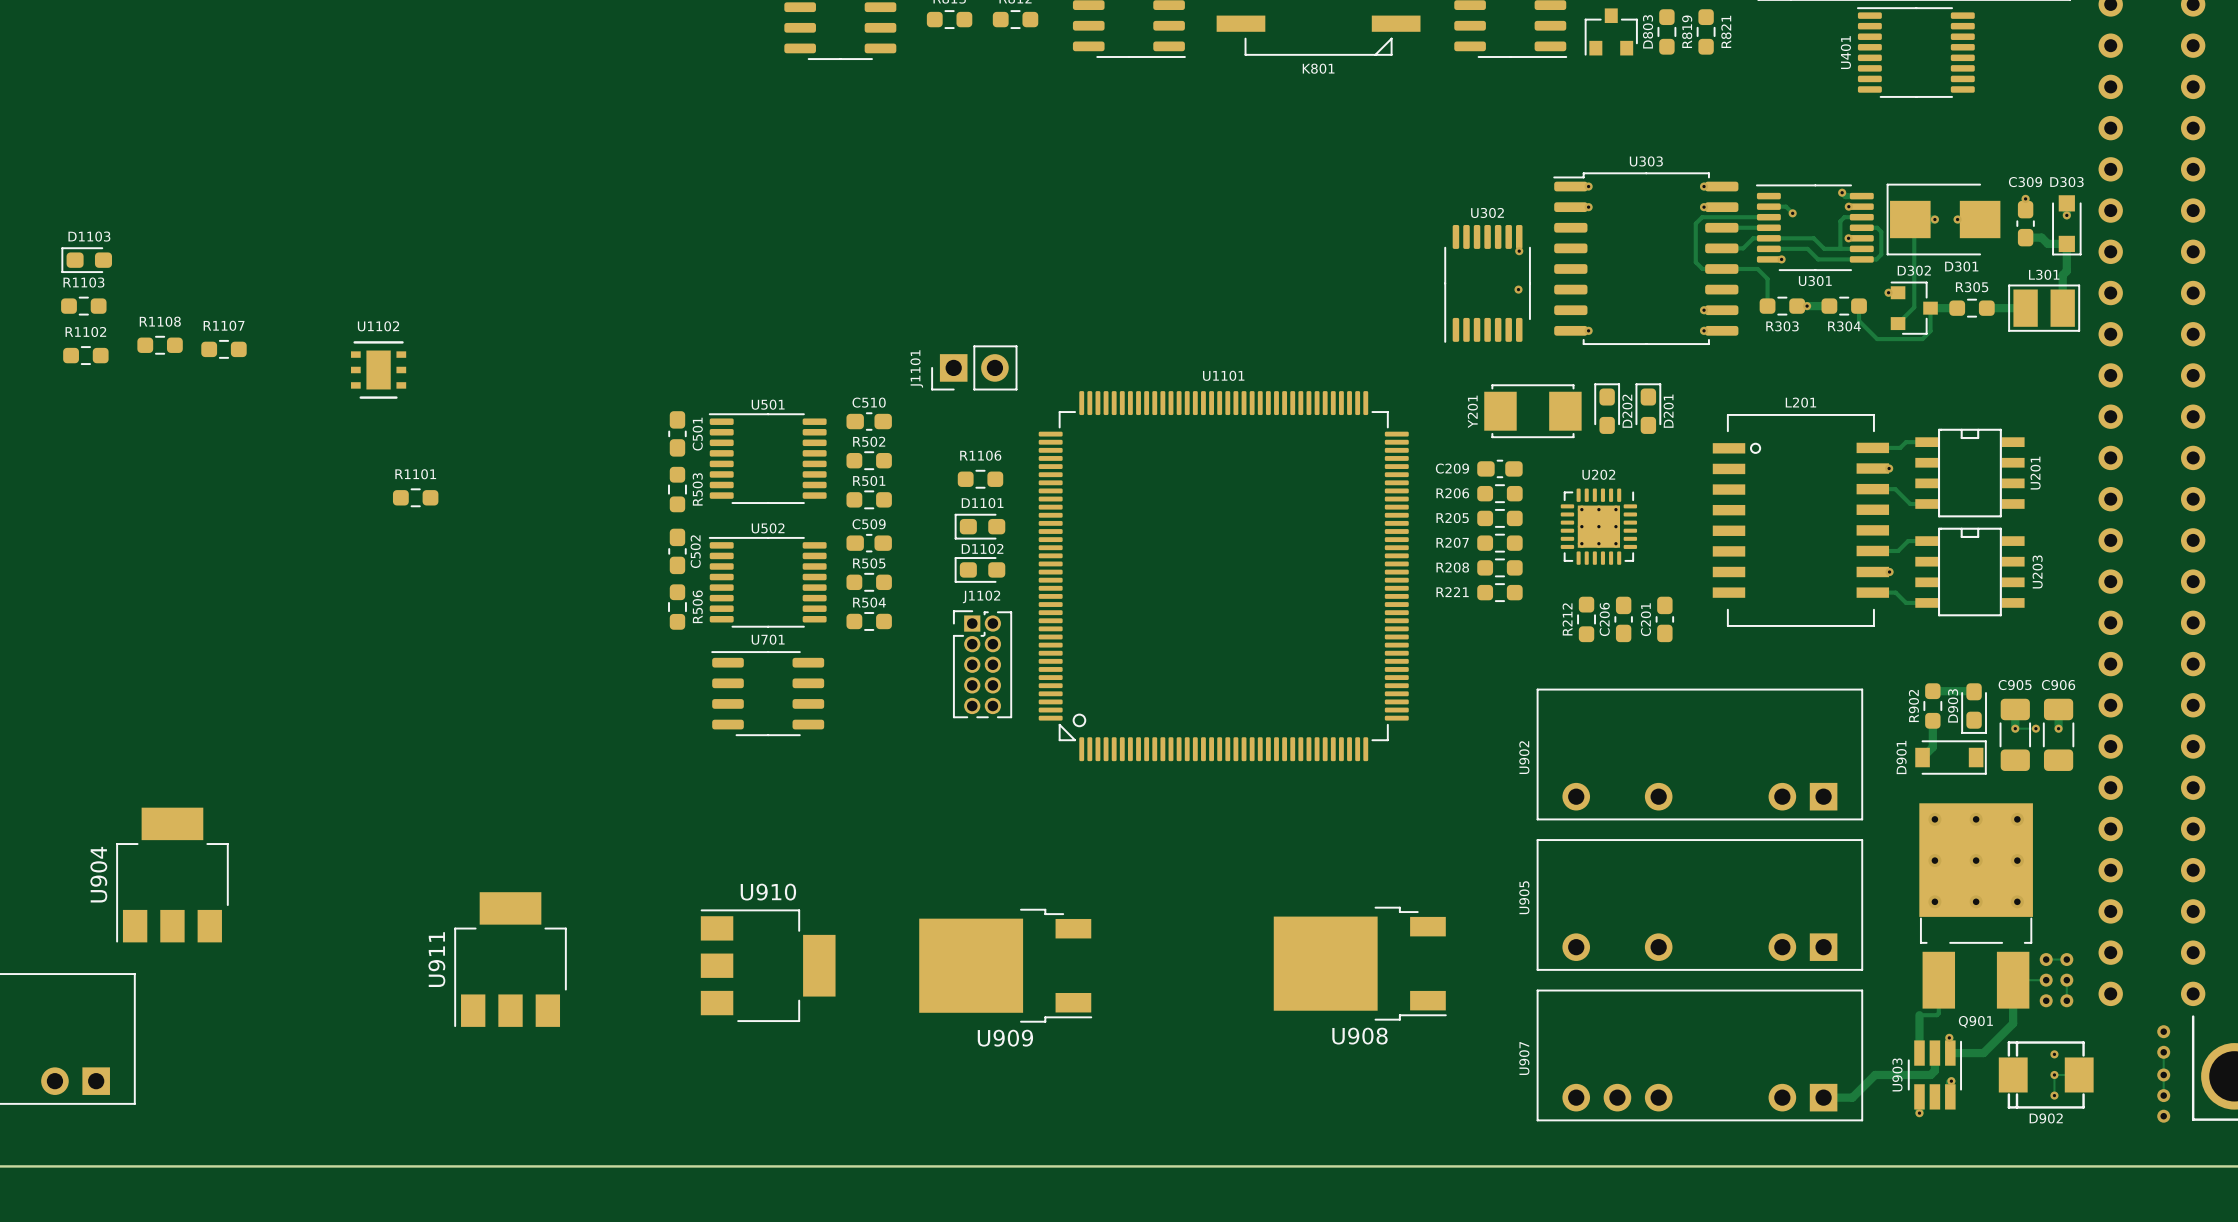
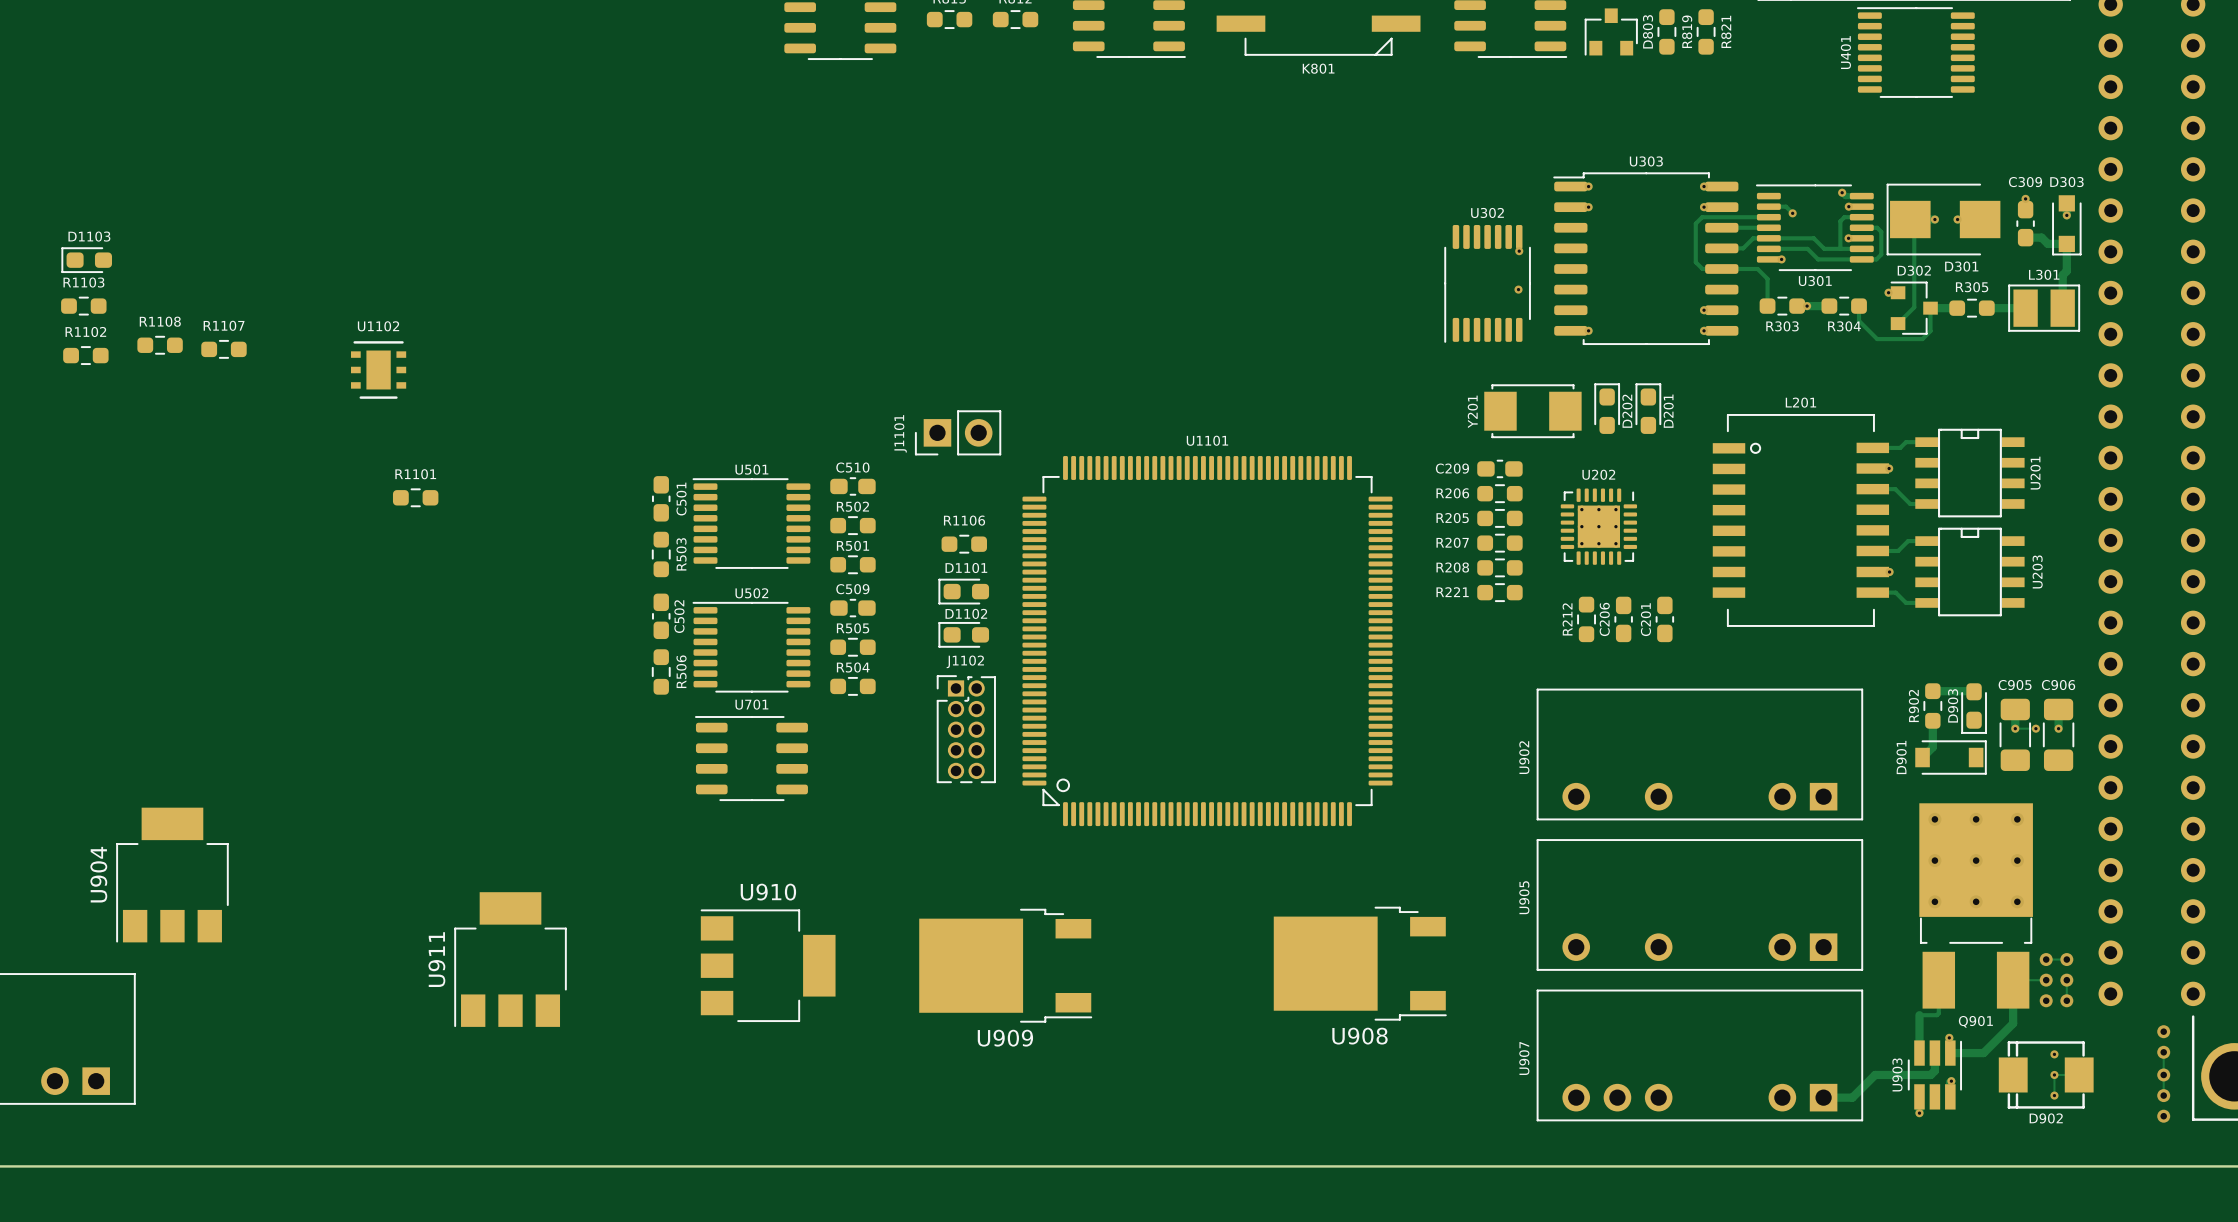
J1101 position: (974, 367) -> (958, 432)
C510 position: (869, 421) -> (852, 486)
C501 position: (677, 433) -> (661, 498)
U501 position: (767, 458) -> (751, 523)
R502 position: (869, 460) -> (852, 525)
R1106 position: (980, 479) -> (964, 544)
R503 position: (677, 489) -> (661, 554)
R501 position: (869, 499) -> (852, 564)
D1101 position: (979, 526) -> (963, 591)
C509 position: (869, 543) -> (852, 608)
C502 position: (677, 551) -> (661, 616)
D1102 position: (979, 569) -> (963, 634)
U1101 position: (1223, 576) -> (1207, 641)
U502 position: (767, 582) -> (751, 647)
R505 position: (869, 582) -> (852, 647)
R506 position: (677, 607) -> (661, 671)
R504 position: (869, 621) -> (852, 686)
J1102 position: (982, 664) -> (966, 729)
U701 position: (767, 693) -> (751, 758)

